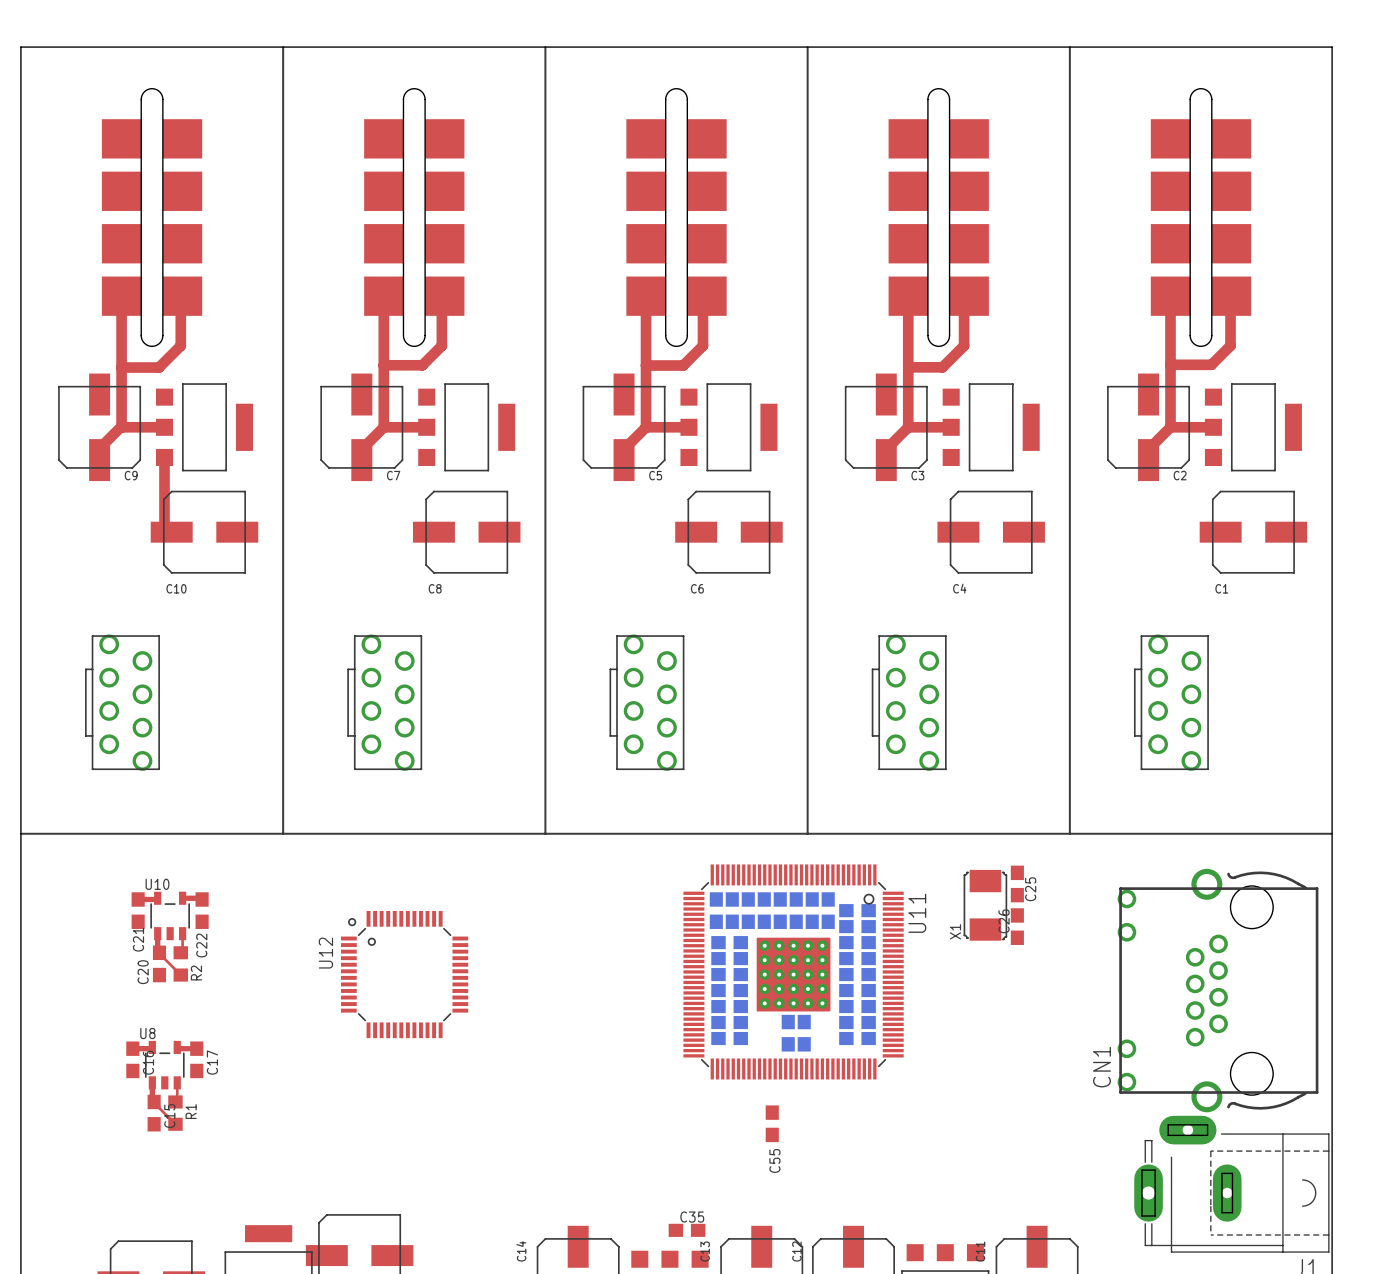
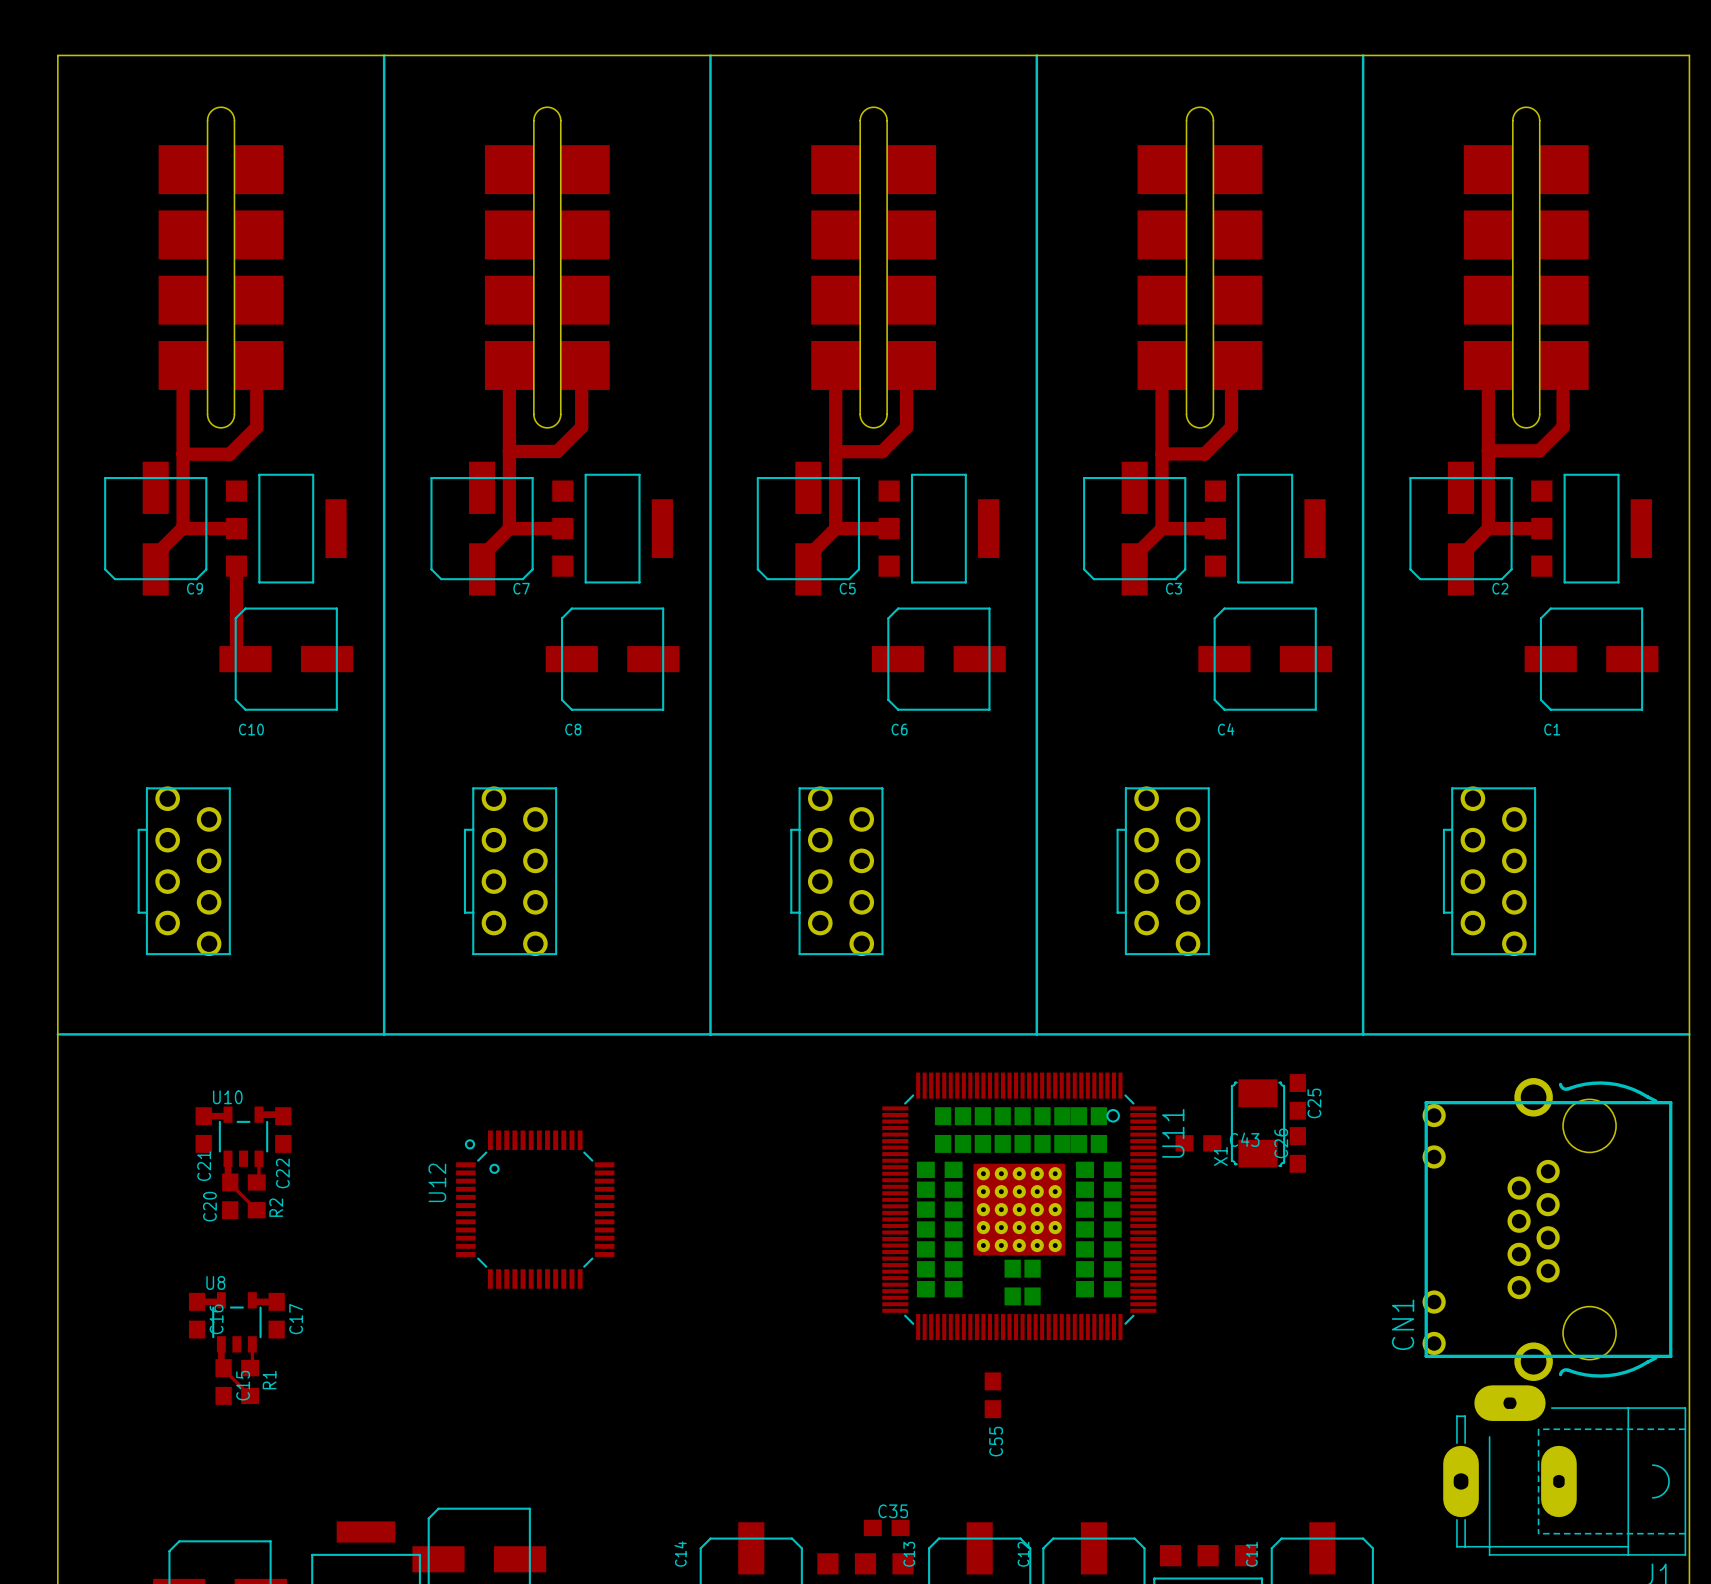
part position: (716, 910) -> (1078, 1130)
part rotation: 0° (857, 910) -> 90° clockwise (1098, 1130)
C43 side: bottom (857, 926) -> top (1198, 1143)

